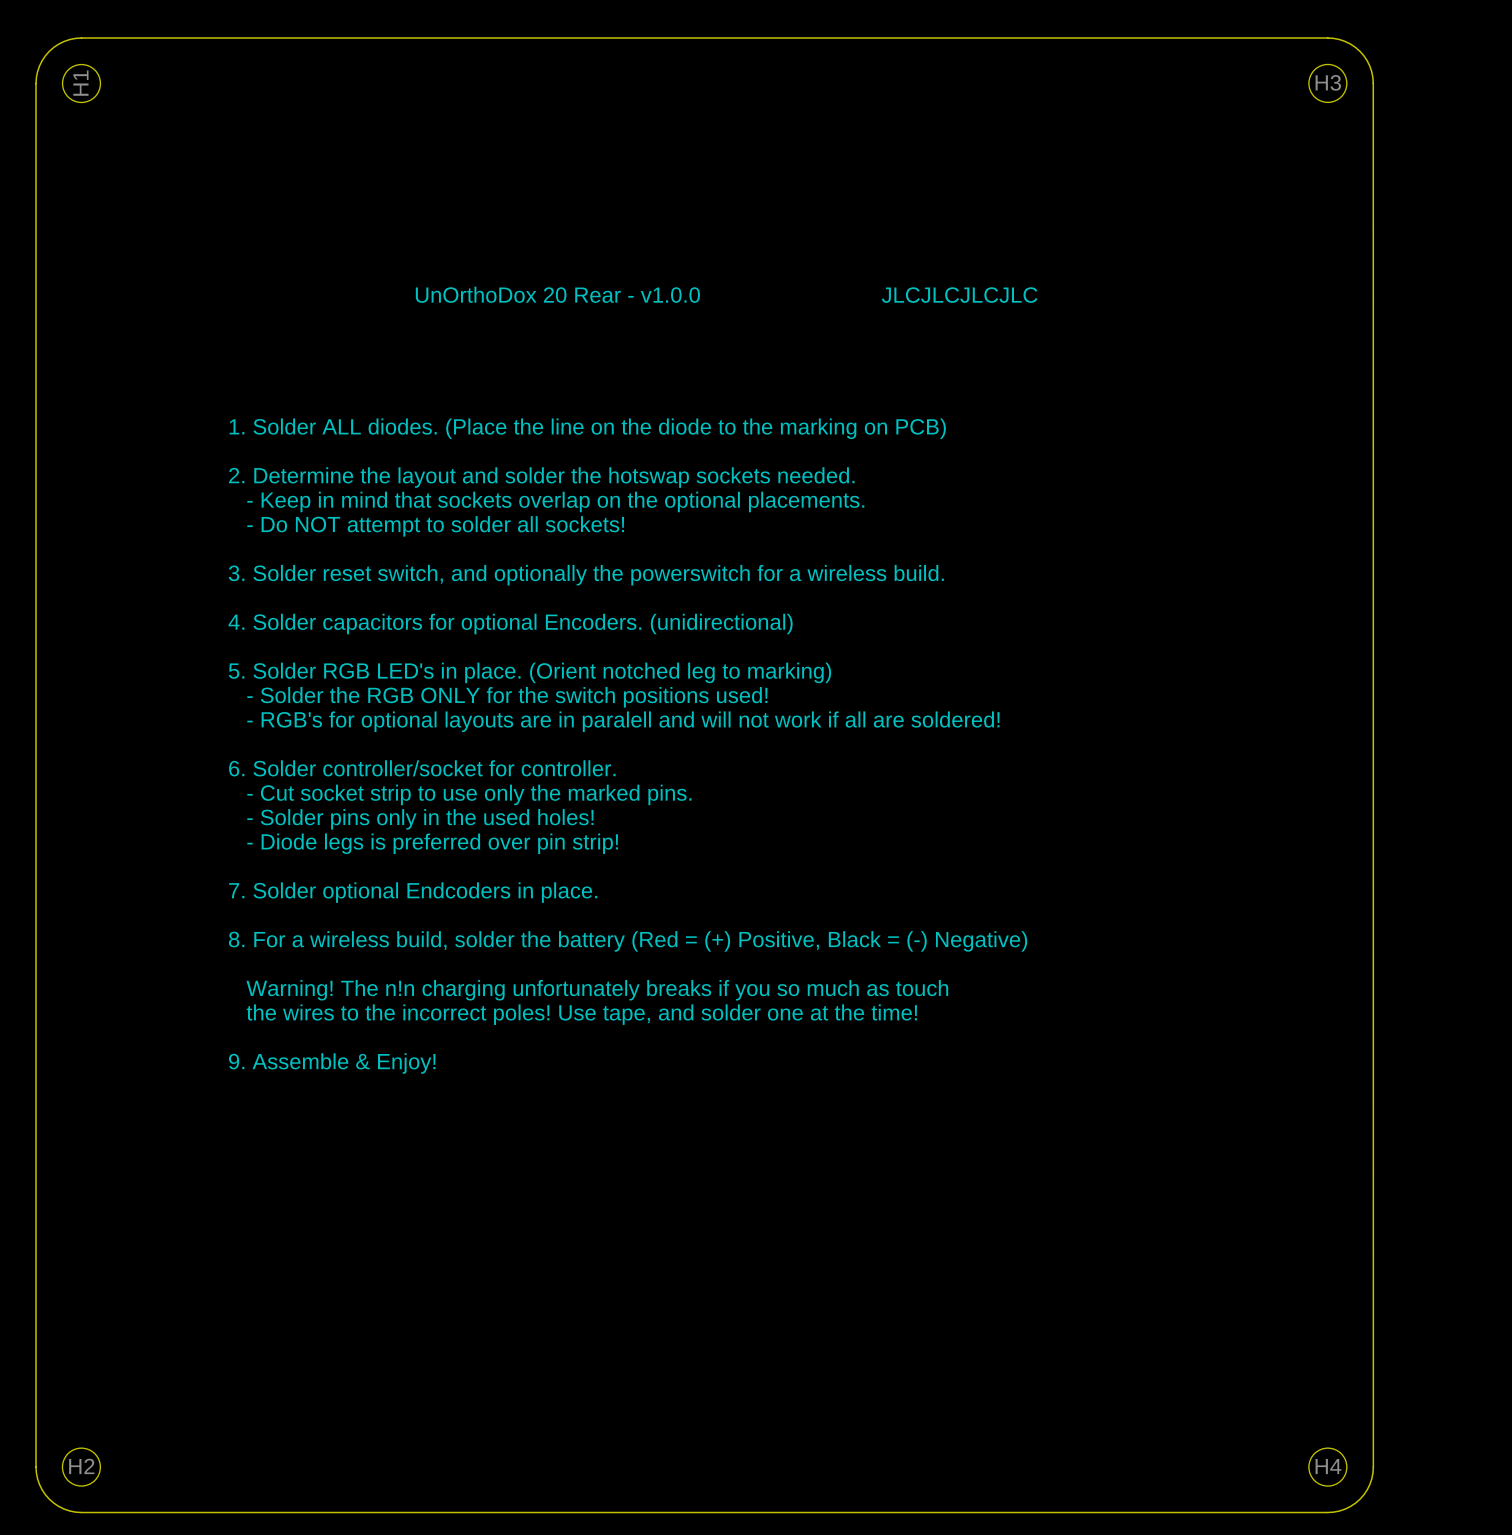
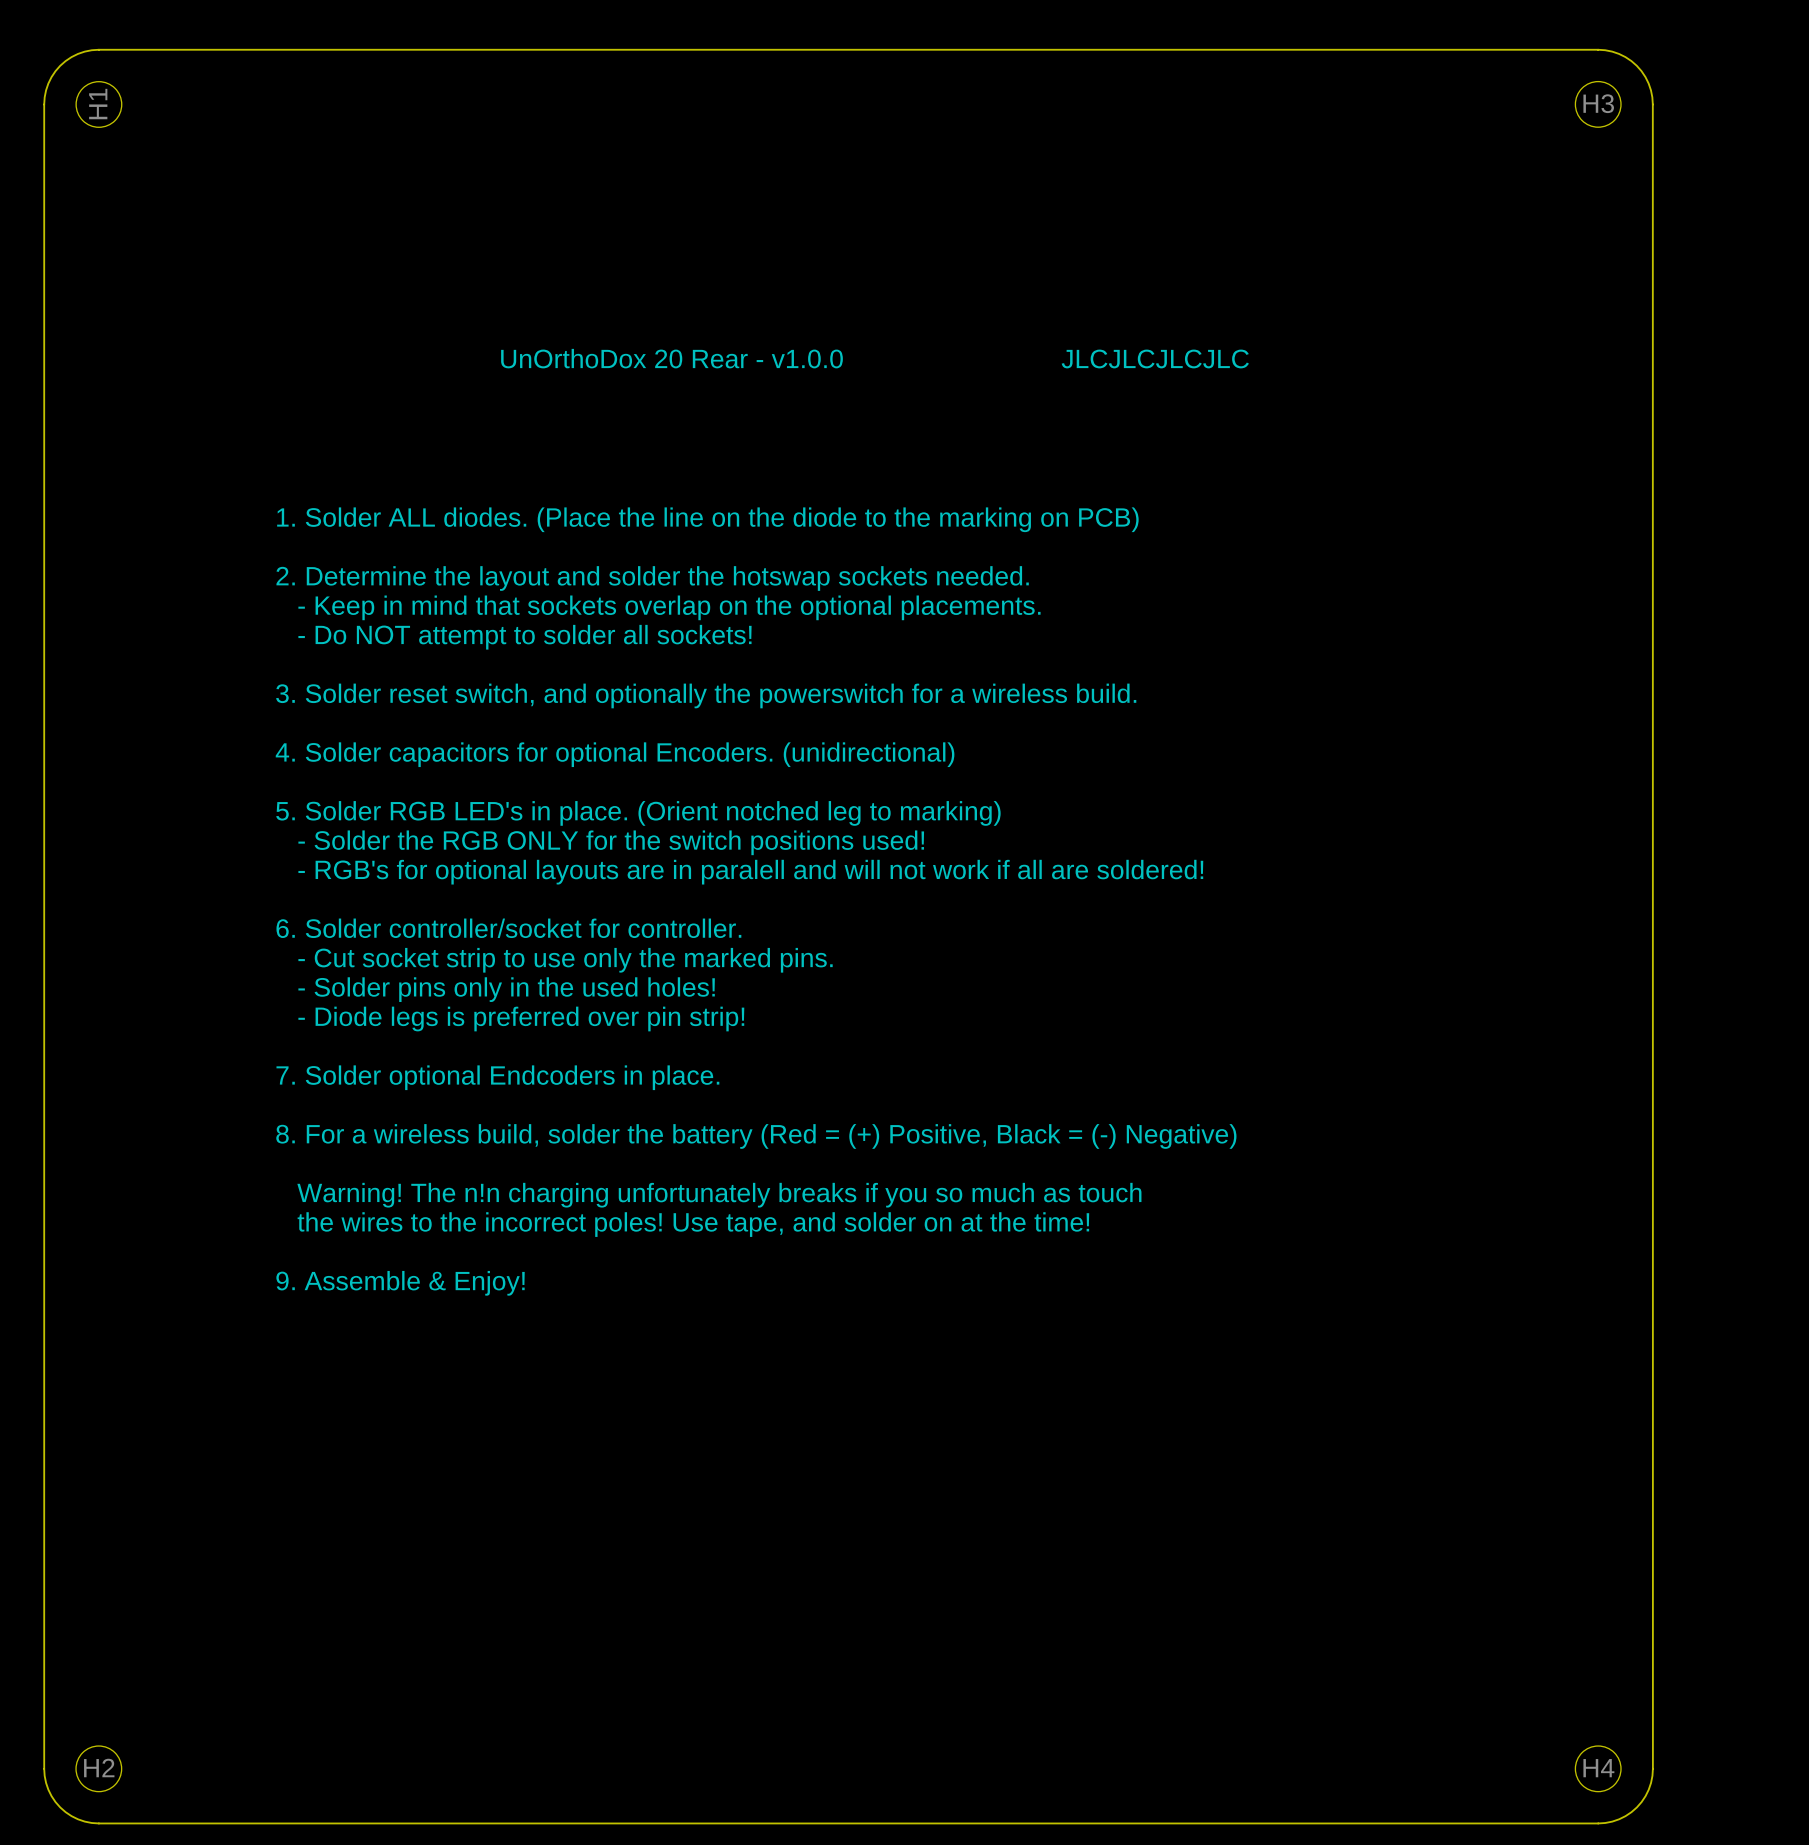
text: the wires to the incorrect poles! Use tape, and solder one at the time! (581, 1014) -> the wires to the incorrect poles! Use tape, and solder on at the time! (693, 1224)

